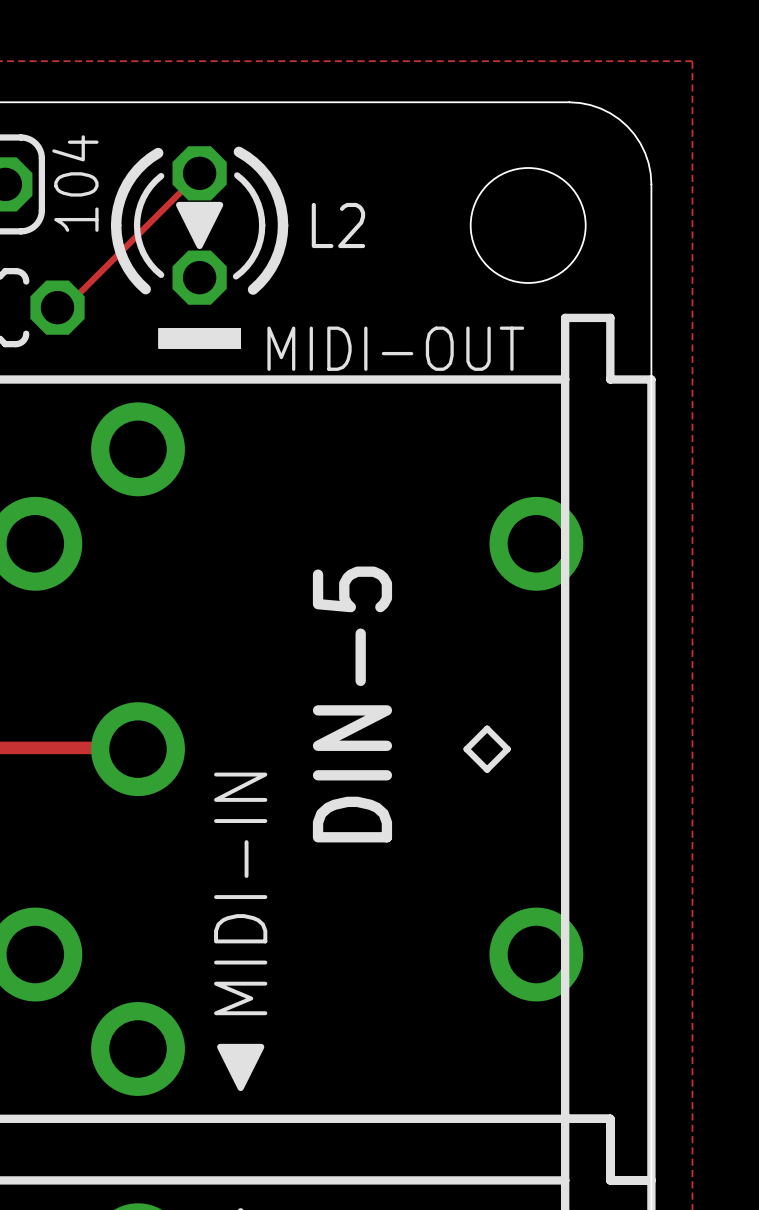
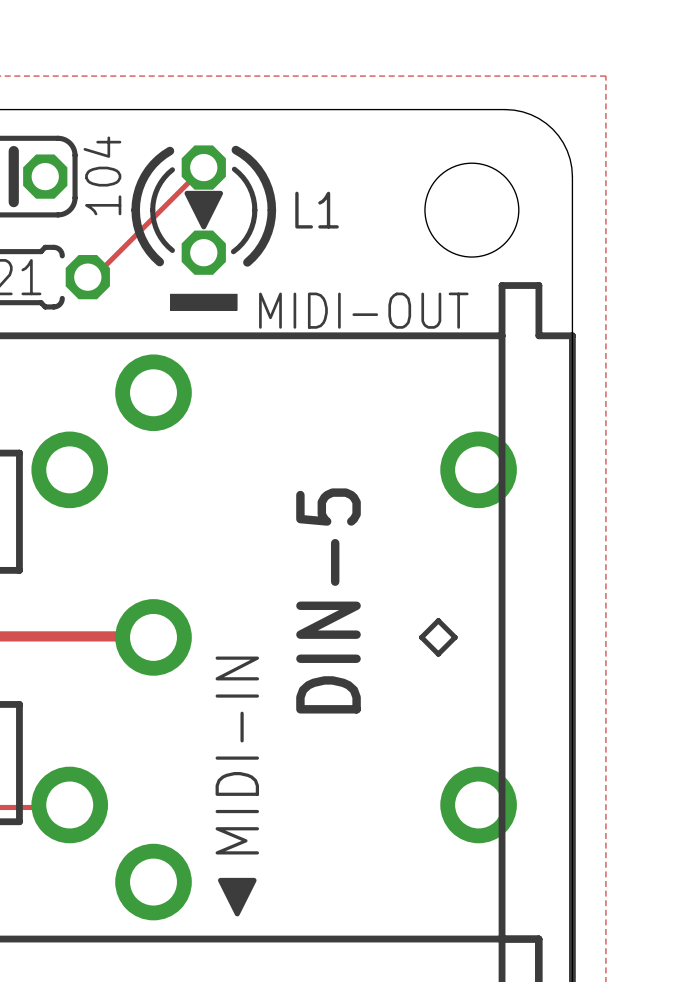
L2 name: L2 (338, 225) -> L1 (317, 210)

